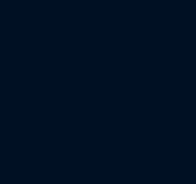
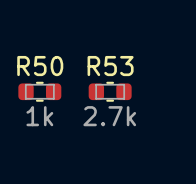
R50: none -> 1k (39, 91)
R53: none -> 2.7k (110, 91)

